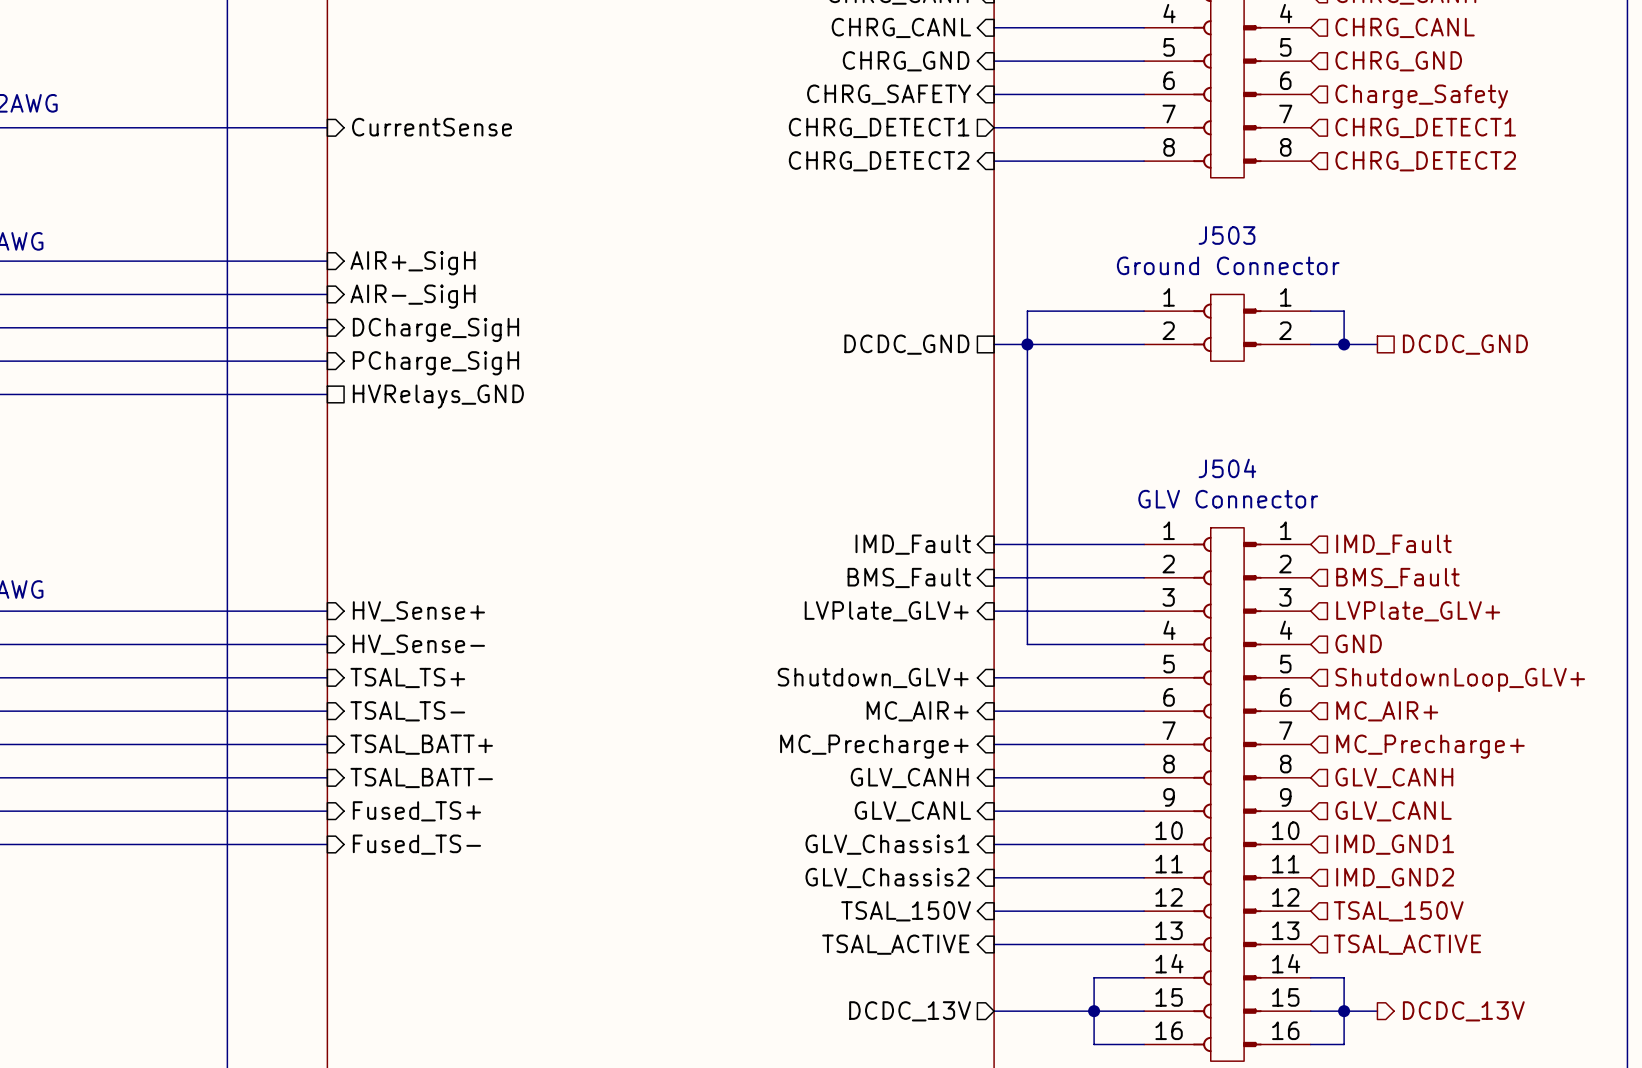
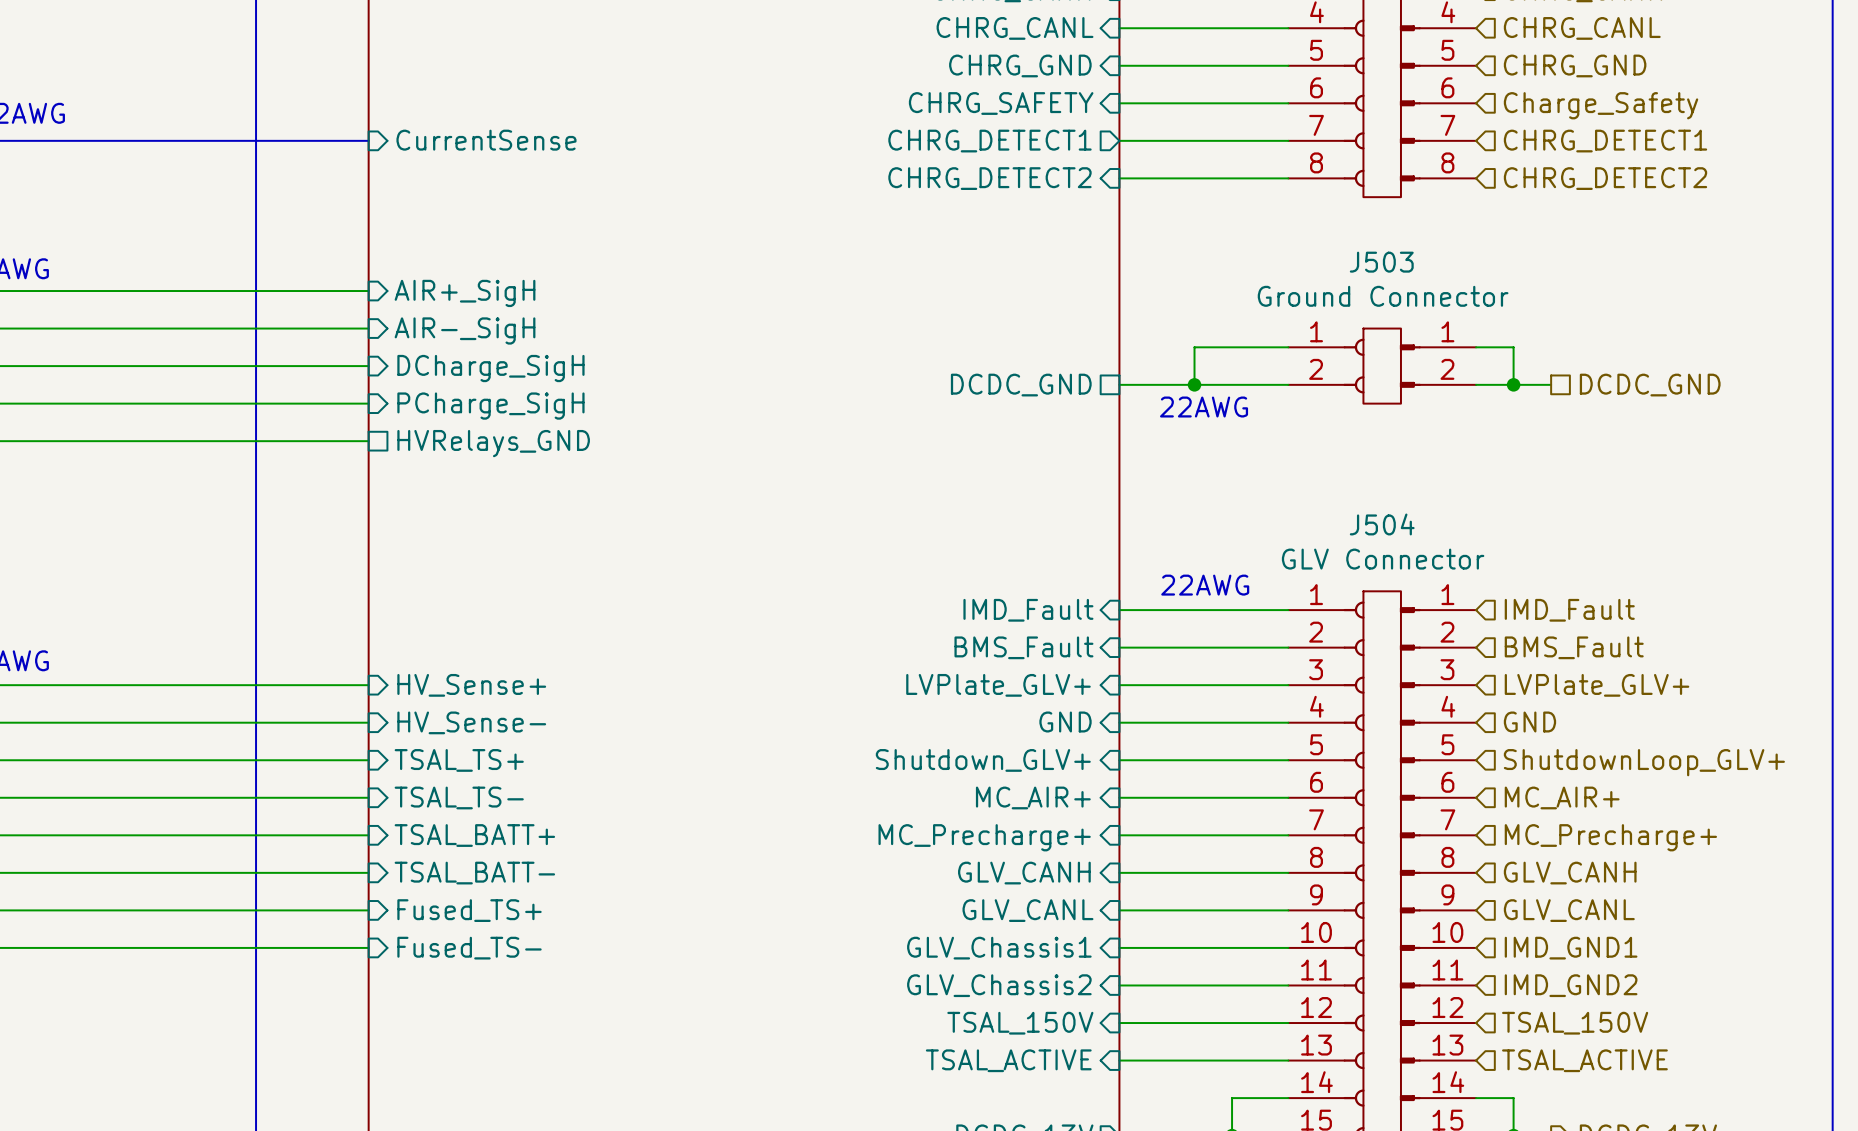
wire: (1060, 311) (1027, 311) (1027, 644) -> (1194, 347) (1194, 384)
junction position: (1027, 344) -> (1194, 384)
text: none -> 22AWG (1204, 407)
text: none -> 22AWG (1205, 585)
sheet pin: none -> GND (1065, 722)
wire: none -> (1119, 722) (1156, 722)

